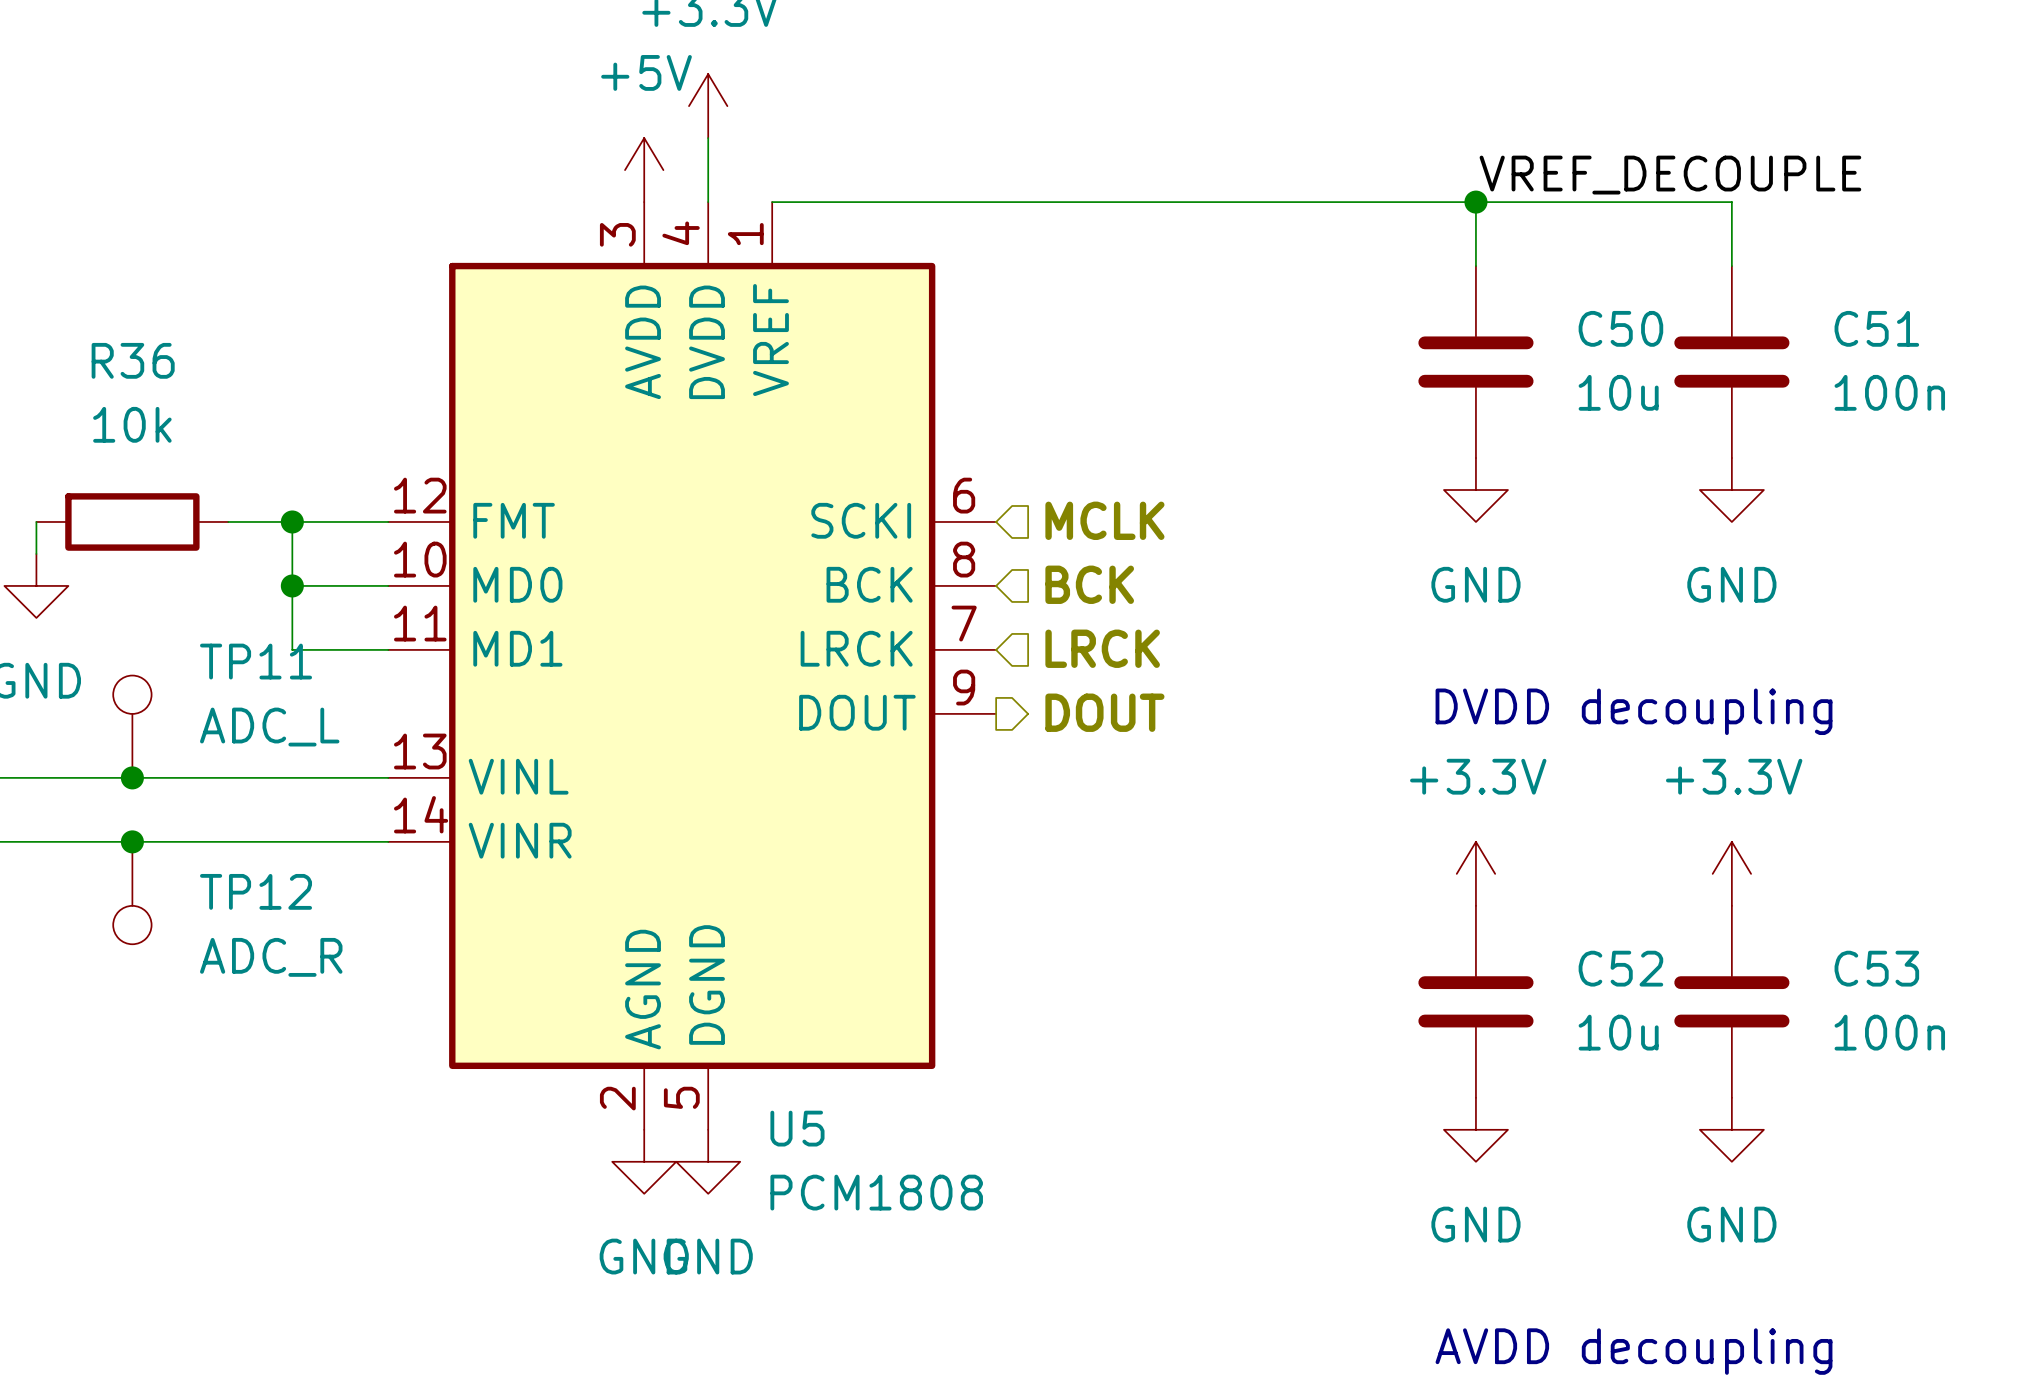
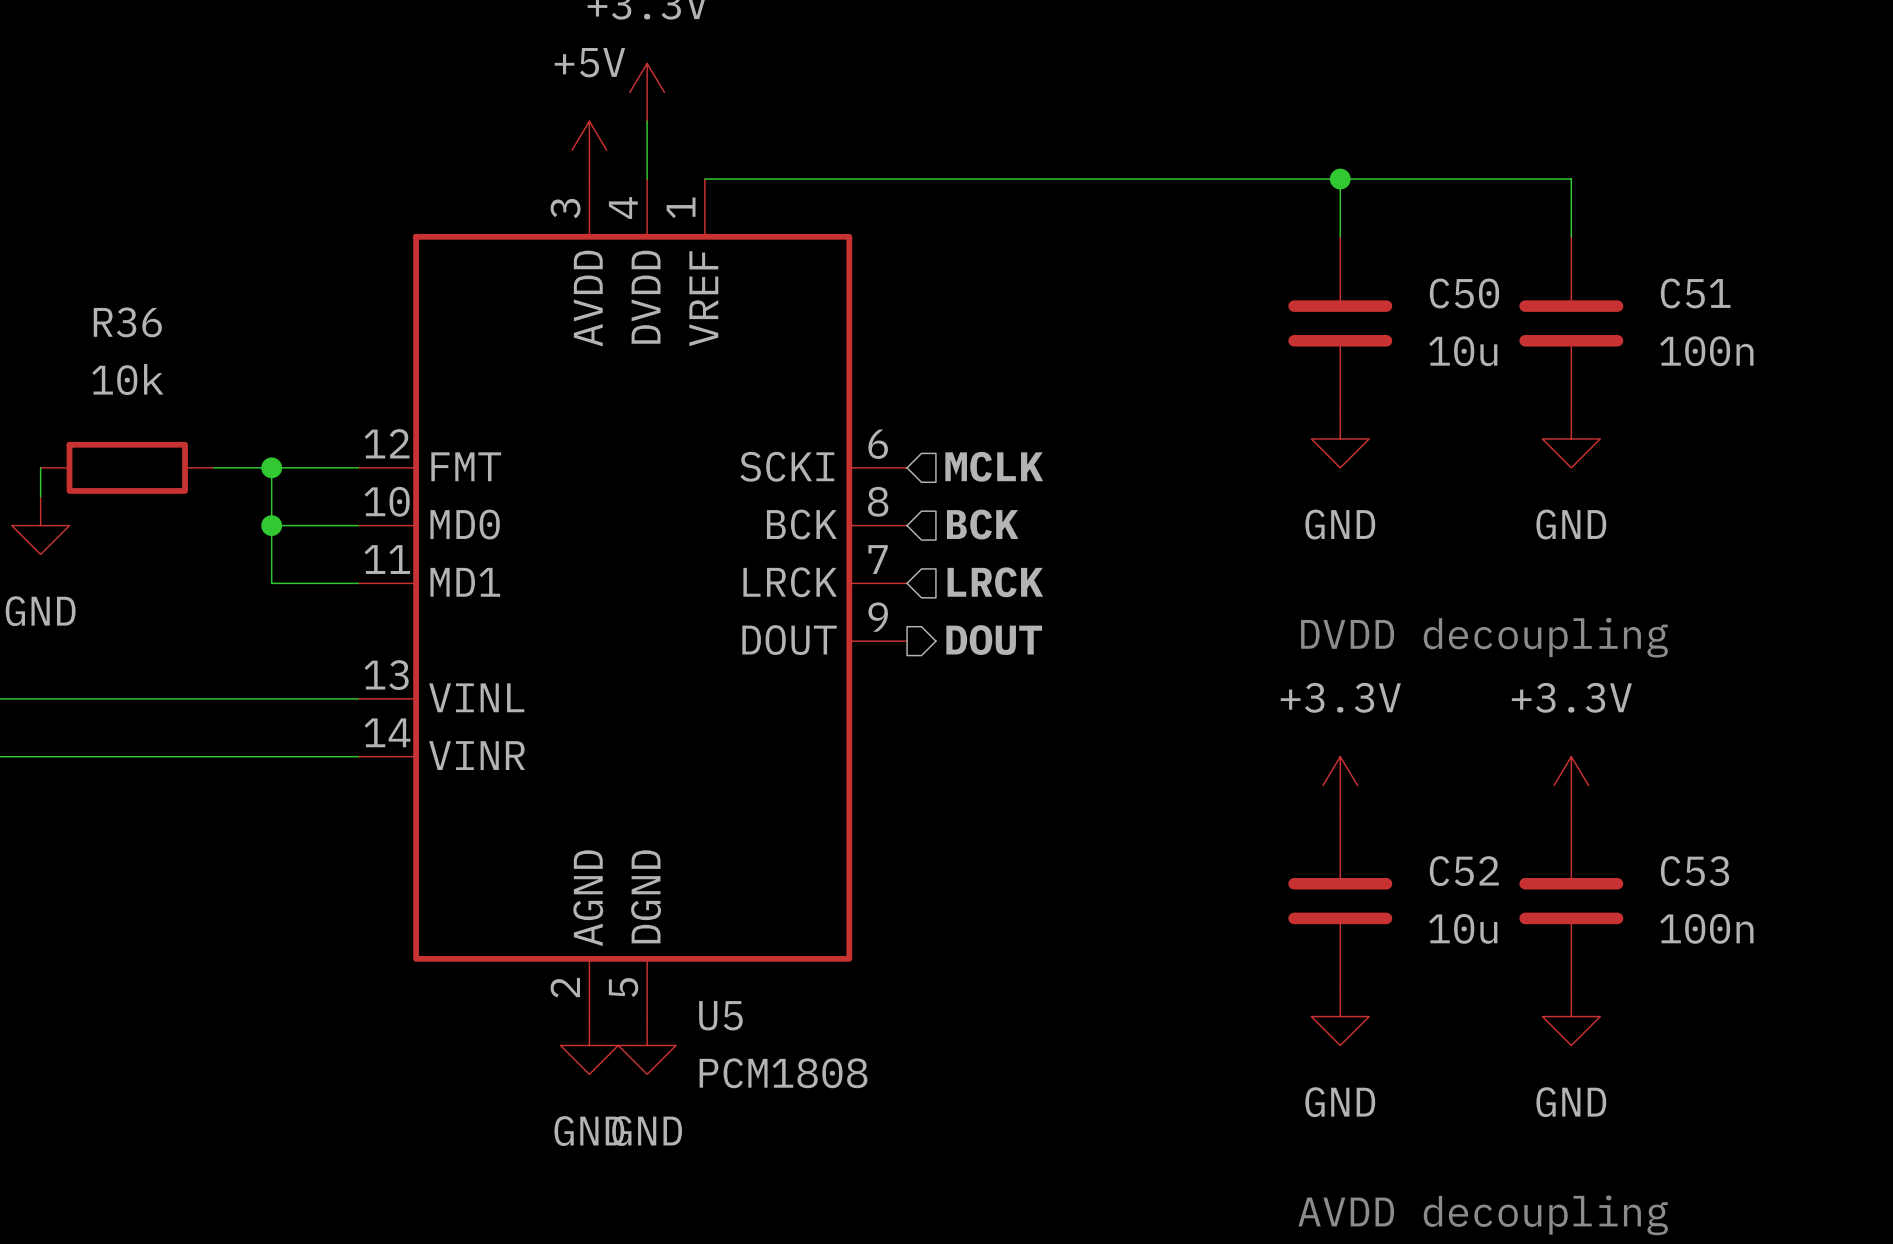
label: VREF_DECOUPLE (1670, 175) -> none
TP11: ADC_L (132, 726) -> none
junction: (132, 777) -> none
junction: (132, 841) -> none
TP12: ADC_R (132, 893) -> none

